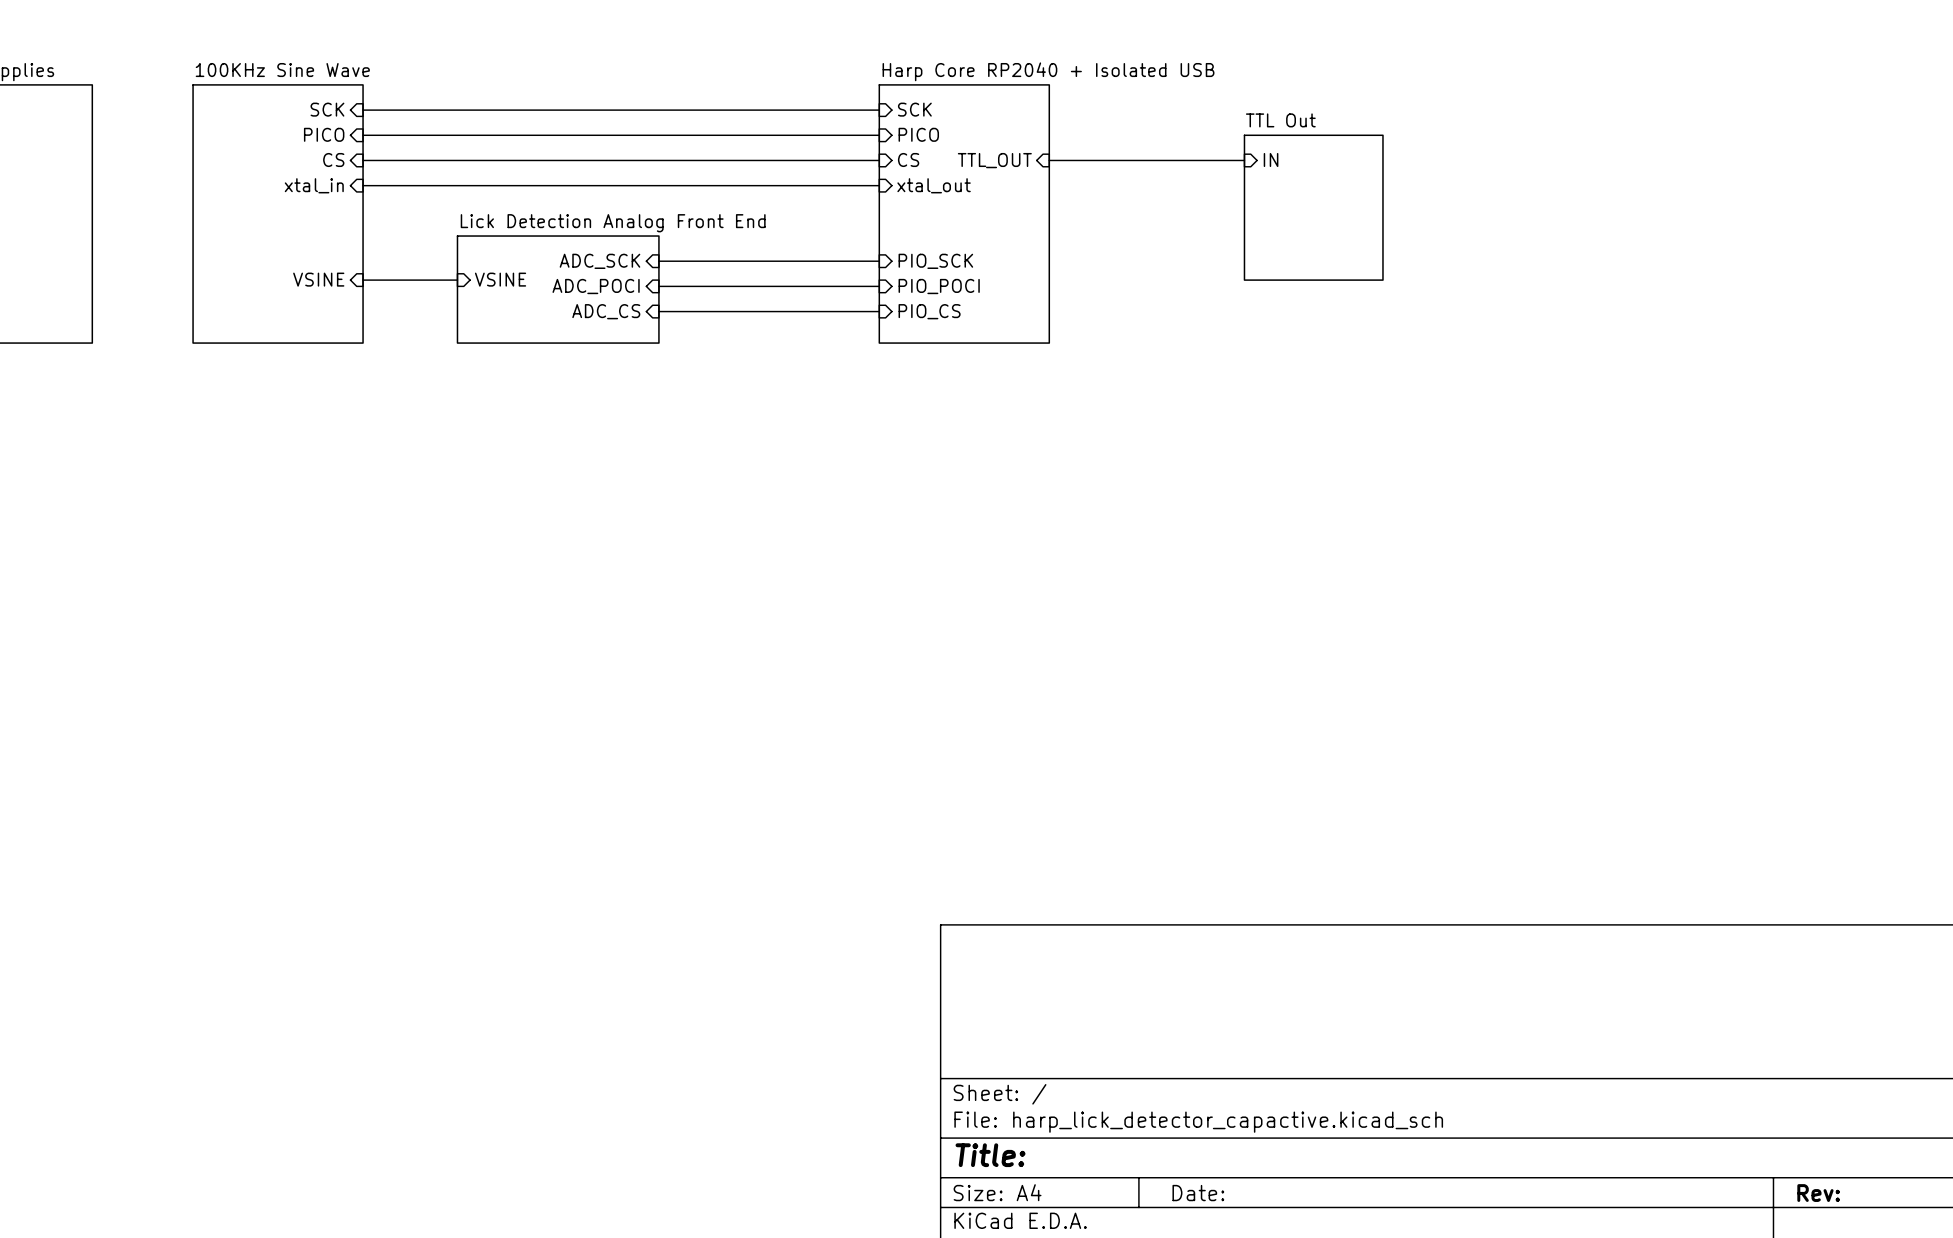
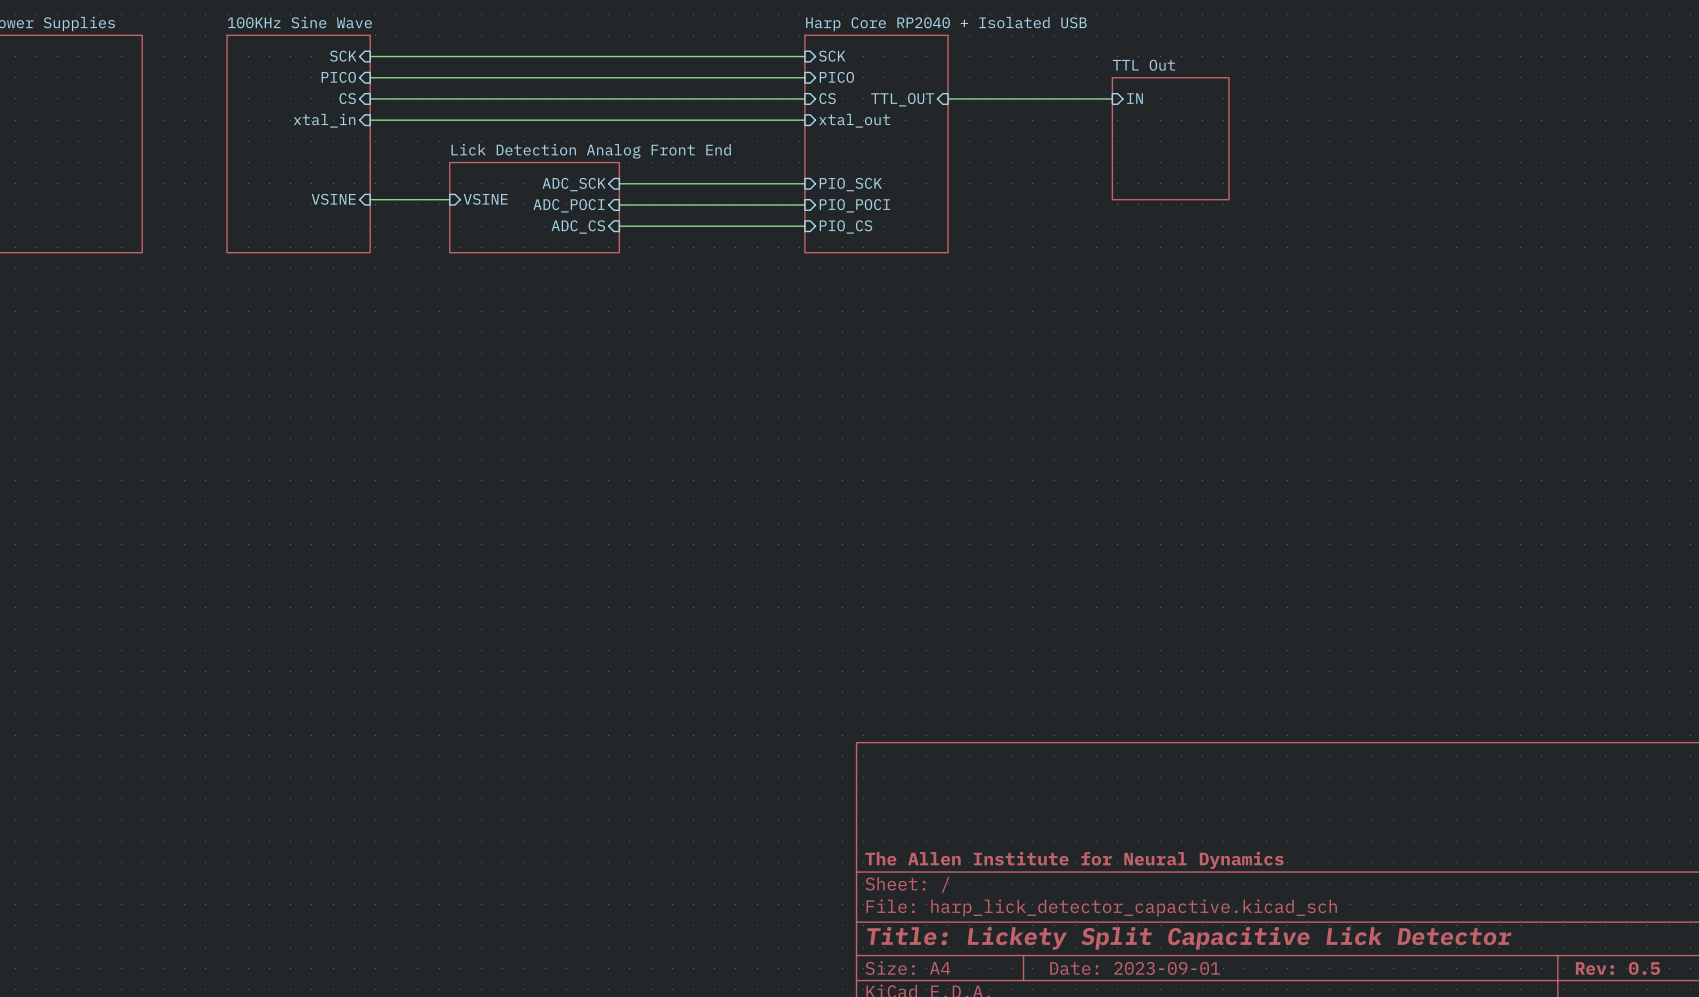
title block: none -> The Allen Institute for Neural Dynamics (1074, 860)
title block: Title: (990, 1155) -> Title: Lickety Split Capacitive Lick Detector (1189, 938)
title block: Date: (1198, 1193) -> Date: 2023-09-01 (1135, 968)
title block: Rev: (1818, 1193) -> Rev: 0.5 (1617, 968)

